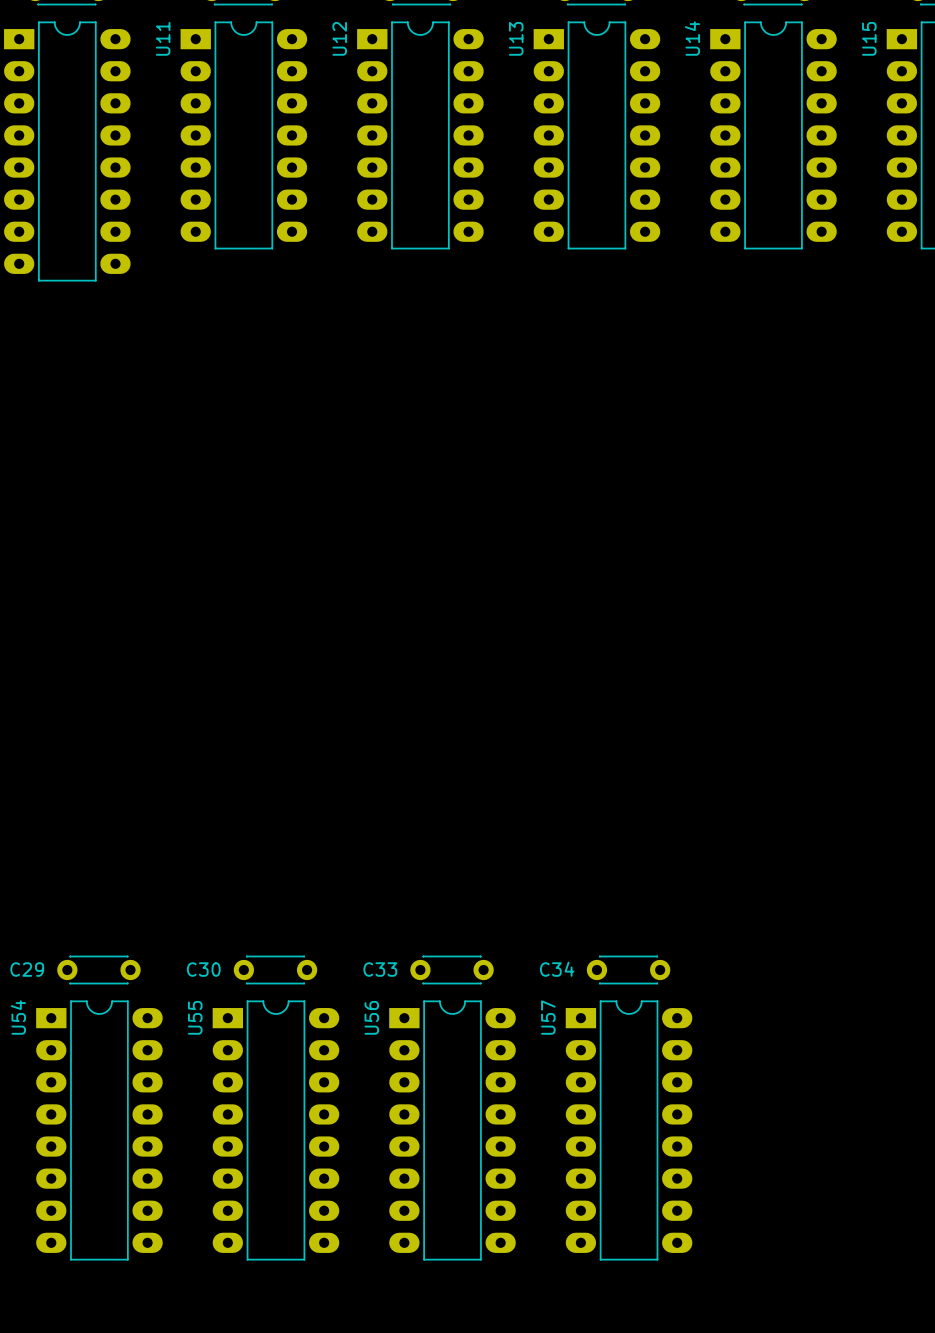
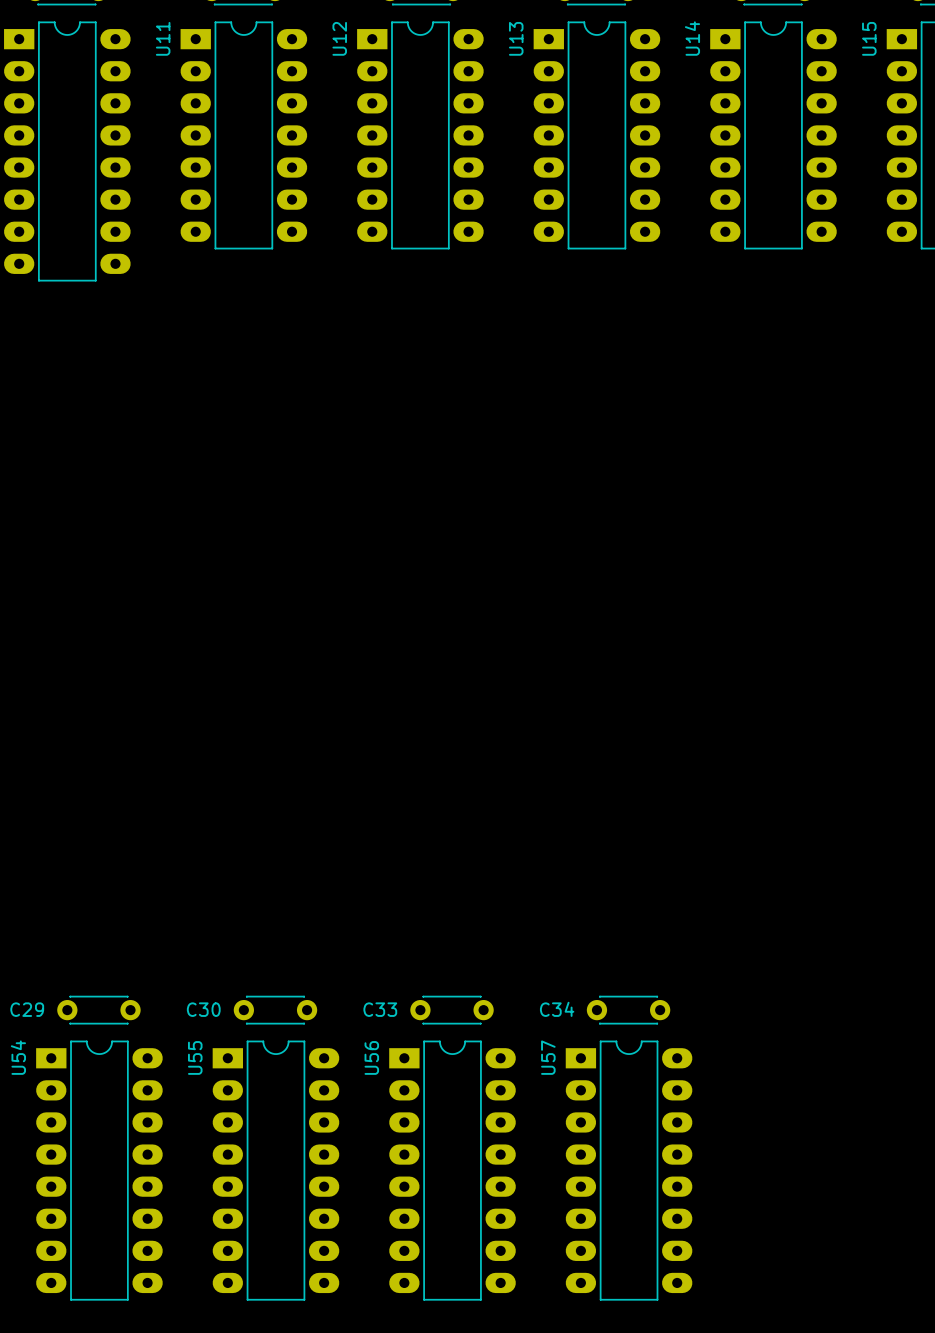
C29 position: (98, 969) -> (98, 1010)
C30 position: (275, 969) -> (275, 1010)
C33 position: (452, 969) -> (452, 1010)
C34 position: (628, 969) -> (628, 1010)
U54 position: (99, 1130) -> (99, 1170)
U55 position: (275, 1130) -> (275, 1170)
U56 position: (452, 1130) -> (452, 1170)
U57 position: (629, 1130) -> (629, 1170)

